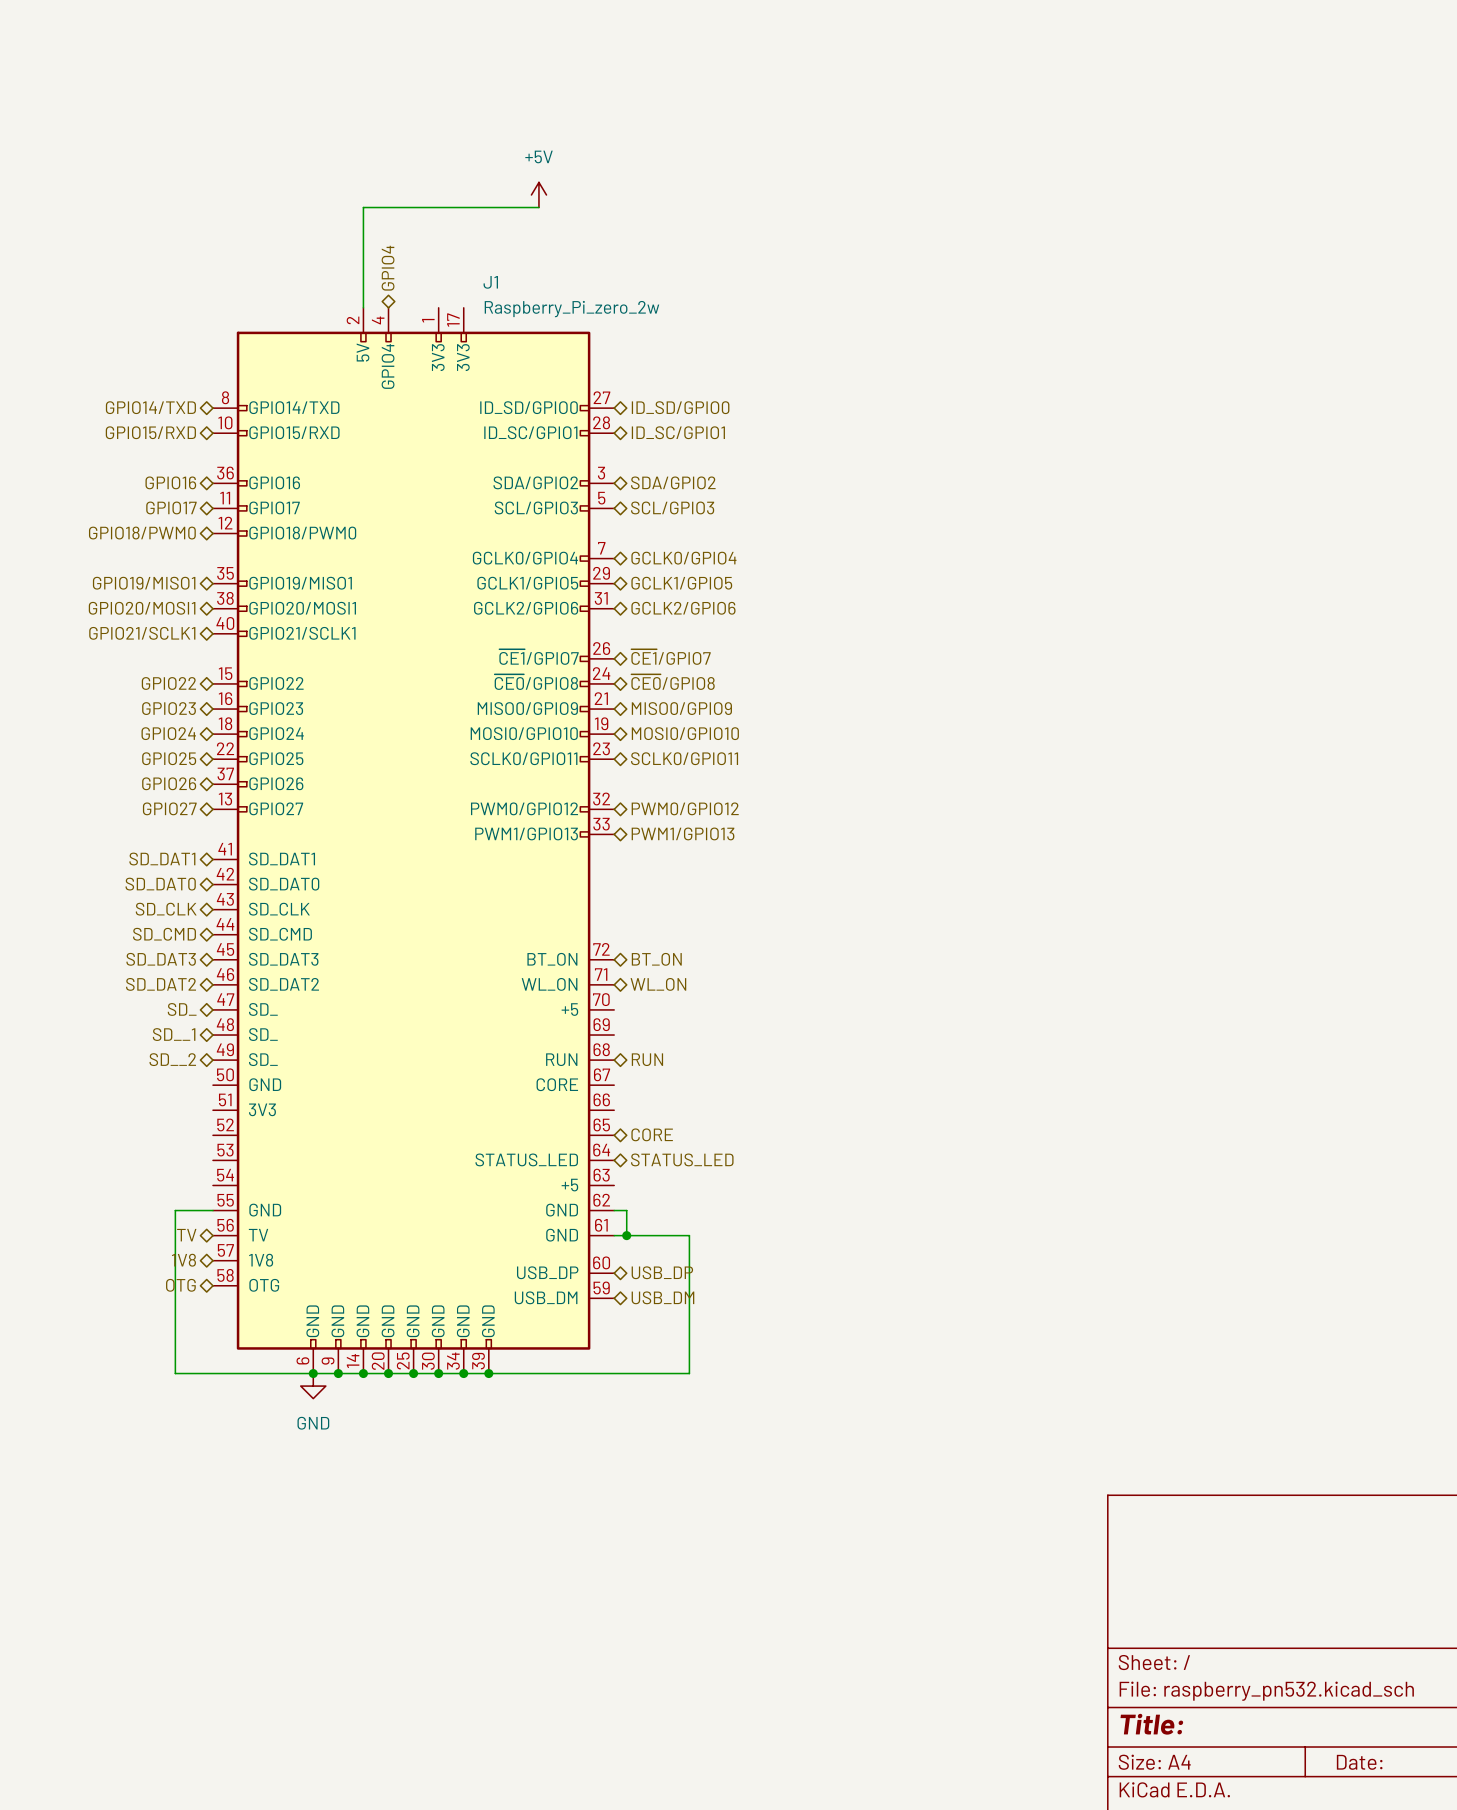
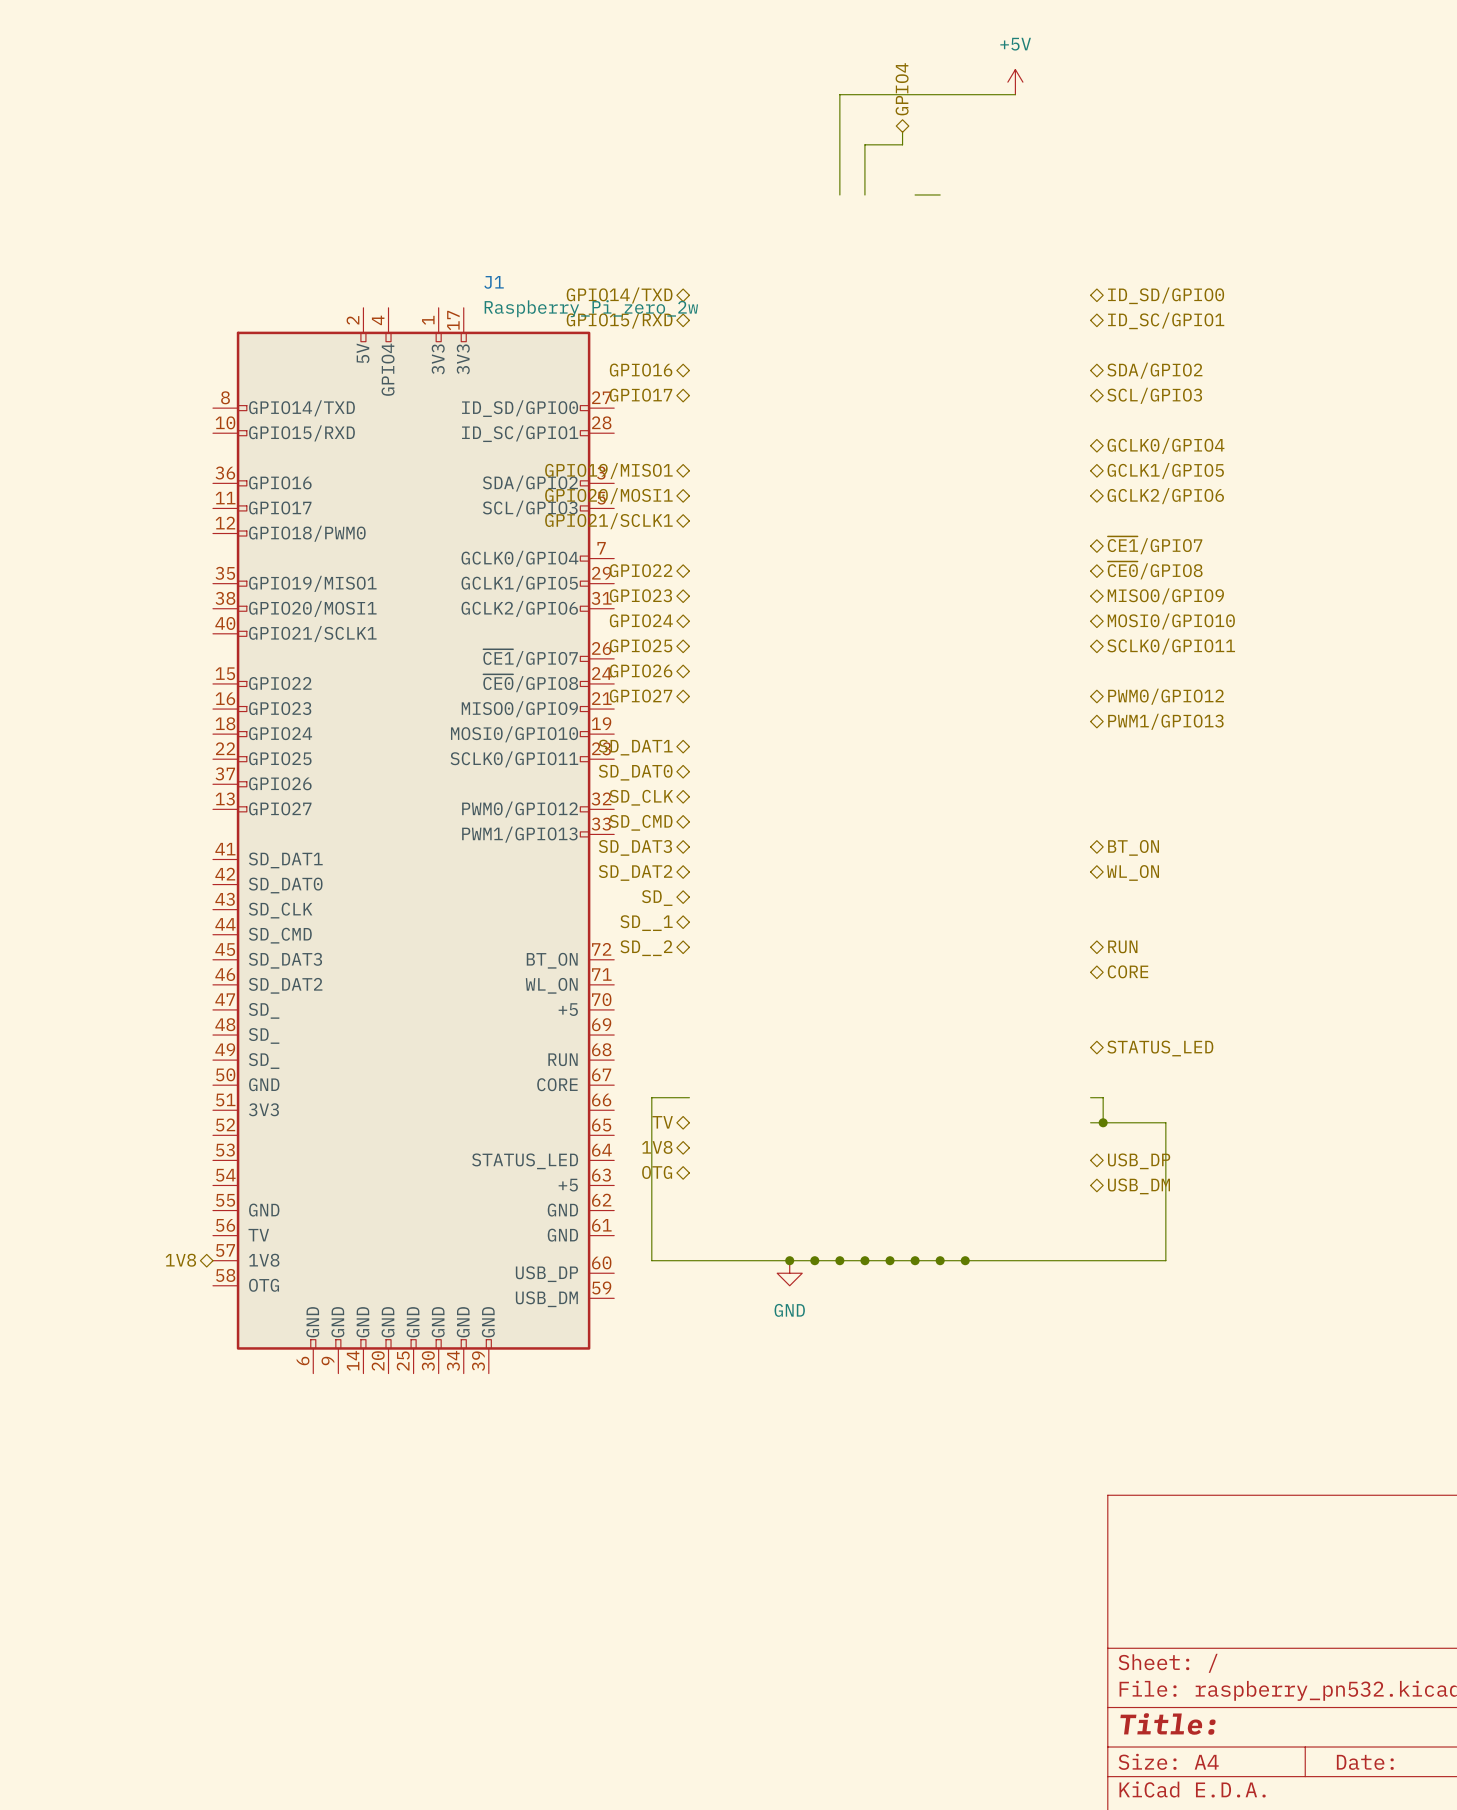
power symbol: none -> +5V (1015, 82)
hierarchical label: none -> GPIO4 (902, 89)
wire: none -> (1015, 94) (839, 94) (839, 194)
wire: none -> (902, 132) (902, 144) (864, 144) (864, 194)
power symbol: +5V (538, 194) -> none
wire: none -> (915, 194) (940, 194)
wire: (538, 207) (363, 207) (363, 307) -> none
hierarchical label: GPIO4 (388, 268) -> none
hierarchical label: none -> GPIO14/TXD (619, 295)
hierarchical label: none -> ID_SD/GPIO0 (1166, 295)
hierarchical label: none -> GPIO15/RXD (619, 320)
hierarchical label: none -> ID_SC/GPIO1 (1166, 320)
hierarchical label: none -> GPIO16 (641, 370)
hierarchical label: none -> SDA/GPIO2 (1154, 370)
hierarchical label: none -> GPIO17 (641, 395)
hierarchical label: none -> SCL/GPIO3 (1154, 395)
hierarchical label: GPIO14/TXD (150, 407) -> none
hierarchical label: ID_SD/GPIO0 (680, 407) -> none
hierarchical label: GPIO15/RXD (150, 432) -> none
hierarchical label: ID_SC/GPIO1 (678, 432) -> none
hierarchical label: none -> GCLK0/GPIO4 (1165, 445)
hierarchical label: none -> GPIO19/MISO1 (608, 471)
hierarchical label: none -> GCLK1/GPIO5 (1165, 471)
hierarchical label: GPIO16 (170, 482) -> none
hierarchical label: SDA/GPIO2 (673, 482) -> none
hierarchical label: none -> GPIO20/MOSI1 (608, 496)
hierarchical label: none -> GCLK2/GPIO6 (1165, 496)
hierarchical label: GPIO17 (171, 507) -> none
hierarchical label: SCL/GPIO3 (672, 507) -> none
hierarchical label: none -> GPIO21/SCLK1 (608, 521)
hierarchical label: GPIO18/PWM0 (142, 533) -> none
hierarchical label: none -> ~{CE1}/GPIO7 (1155, 545)
hierarchical label: GCLK0/GPIO4 (683, 558) -> none
hierarchical label: none -> ~{CE0}/GPIO8 (1155, 570)
hierarchical label: none -> GPIO22 (641, 570)
hierarchical label: GPIO19/MISO1 (144, 583) -> none
hierarchical label: GCLK1/GPIO5 (681, 583) -> none
hierarchical label: none -> GPIO23 (640, 595)
hierarchical label: none -> MISO0/GPIO9 (1165, 596)
hierarchical label: GPIO20/MOSI1 (142, 608) -> none
hierarchical label: GCLK2/GPIO6 (683, 608) -> none
hierarchical label: none -> GPIO24 (641, 620)
hierarchical label: none -> MOSI0/GPIO10 (1171, 621)
hierarchical label: GPIO21/SCLK1 (142, 633) -> none
hierarchical label: none -> GPIO25 (641, 645)
hierarchical label: none -> SCLK0/GPIO11 (1171, 646)
hierarchical label: ~{CE1}/GPIO7 (671, 657) -> none
hierarchical label: none -> GPIO26 (641, 670)
hierarchical label: ~{CE0}/GPIO8 (673, 682) -> none
hierarchical label: GPIO22 (168, 683) -> none
hierarchical label: none -> GPIO27 (641, 696)
hierarchical label: none -> PWM0/GPIO12 (1166, 696)
hierarchical label: GPIO23 (169, 708) -> none
hierarchical label: MISO0/GPIO9 (681, 708) -> none
hierarchical label: none -> PWM1/GPIO13 (1165, 721)
hierarchical label: GPIO24 (168, 733) -> none
hierarchical label: MOSI0/GPIO10 (685, 733) -> none
hierarchical label: none -> SD_DAT1 (635, 747)
hierarchical label: GPIO25 (169, 758) -> none
hierarchical label: SCLK0/GPIO11 (684, 758) -> none
hierarchical label: none -> SD_DAT0 (635, 772)
hierarchical label: GPIO26 (169, 783) -> none
hierarchical label: none -> SD_CLK (641, 797)
hierarchical label: GPIO27 (169, 808) -> none
hierarchical label: PWM0/GPIO12 (685, 808) -> none
hierarchical label: none -> SD_CMD (641, 822)
hierarchical label: PWM1/GPIO13 (683, 833) -> none
hierarchical label: none -> SD_DAT3 (635, 847)
hierarchical label: none -> BT_ON (1133, 847)
hierarchical label: SD_DAT1 (162, 859) -> none
hierarchical label: none -> SD_DAT2 (635, 872)
hierarchical label: none -> WL_ON (1133, 872)
hierarchical label: SD_DAT0 (160, 884) -> none
hierarchical label: none -> SD_ (657, 898)
hierarchical label: SD_CLK (166, 909) -> none
hierarchical label: none -> SD__1 (646, 923)
hierarchical label: SD_CMD (164, 934) -> none
hierarchical label: none -> SD__2 (646, 948)
hierarchical label: none -> RUN (1122, 946)
hierarchical label: SD_DAT3 (161, 959) -> none
hierarchical label: BT_ON (656, 959) -> none
hierarchical label: none -> CORE (1128, 971)
hierarchical label: SD_DAT2 (161, 984) -> none
hierarchical label: WL_ON (658, 984) -> none
hierarchical label: SD_ (182, 1009) -> none
hierarchical label: SD__1 (174, 1034) -> none
hierarchical label: none -> STATUS_LED (1160, 1048)
hierarchical label: SD__2 (172, 1059) -> none
hierarchical label: RUN (647, 1059) -> none
wire: none -> (689, 1097) (651, 1097) (651, 1260) (1165, 1260) (1165, 1122) (1090, 1122)
wire: none -> (1090, 1097) (1103, 1097) (1103, 1122)
hierarchical label: none -> TV (662, 1122)
junction: none -> (1103, 1122)
hierarchical label: CORE (652, 1134) -> none
hierarchical label: none -> 1V8 (657, 1147)
hierarchical label: STATUS_LED (682, 1159) -> none
hierarchical label: none -> USB_DP (1139, 1161)
hierarchical label: none -> OTG (657, 1172)
hierarchical label: none -> USB_DM (1138, 1186)
wire: (212, 1210) (175, 1210) (175, 1373) (689, 1373) (689, 1235) (614, 1235) -> none
wire: (614, 1210) (626, 1210) (626, 1235) -> none
hierarchical label: TV (186, 1235) -> none
junction: (626, 1235) -> none
junction: none -> (789, 1260)
junction: none -> (814, 1260)
junction: none -> (839, 1260)
junction: none -> (864, 1260)
junction: none -> (890, 1260)
junction: none -> (915, 1260)
junction: none -> (940, 1260)
junction: none -> (965, 1260)
hierarchical label: USB_DP (662, 1272) -> none
power symbol: none -> GND (789, 1273)
hierarchical label: OTG (180, 1285) -> none
hierarchical label: USB_DM (662, 1297) -> none
junction: (313, 1373) -> none
junction: (338, 1373) -> none
junction: (363, 1373) -> none
junction: (388, 1373) -> none
junction: (413, 1373) -> none
junction: (438, 1373) -> none
junction: (463, 1373) -> none
junction: (488, 1373) -> none
power symbol: GND (313, 1386) -> none

